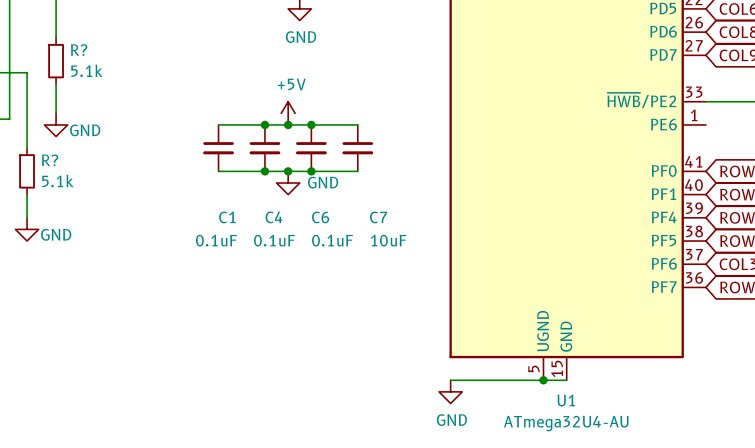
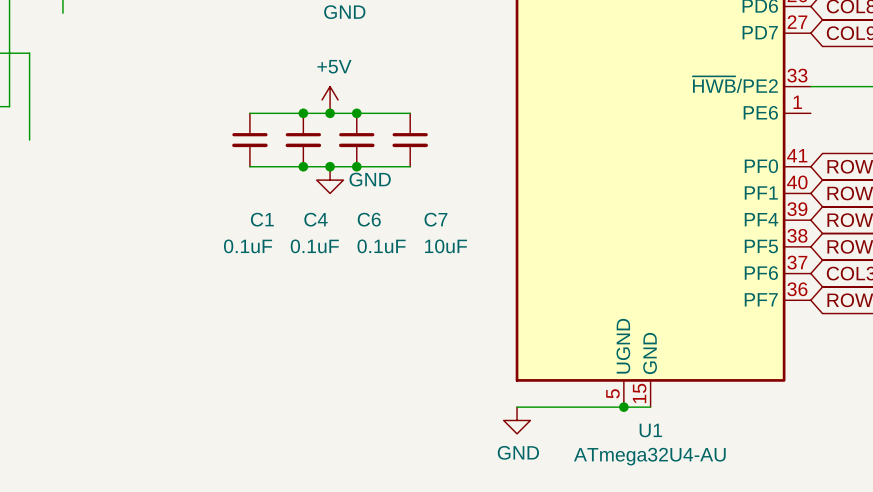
R?: 5.1k (56, 61) -> none
wire: (56, 84) (56, 113) -> none
power symbol: GND (56, 124) -> none
R?: 5.1k (27, 171) -> none
wire: (27, 194) (27, 217) -> none
power symbol: GND (27, 229) -> none

